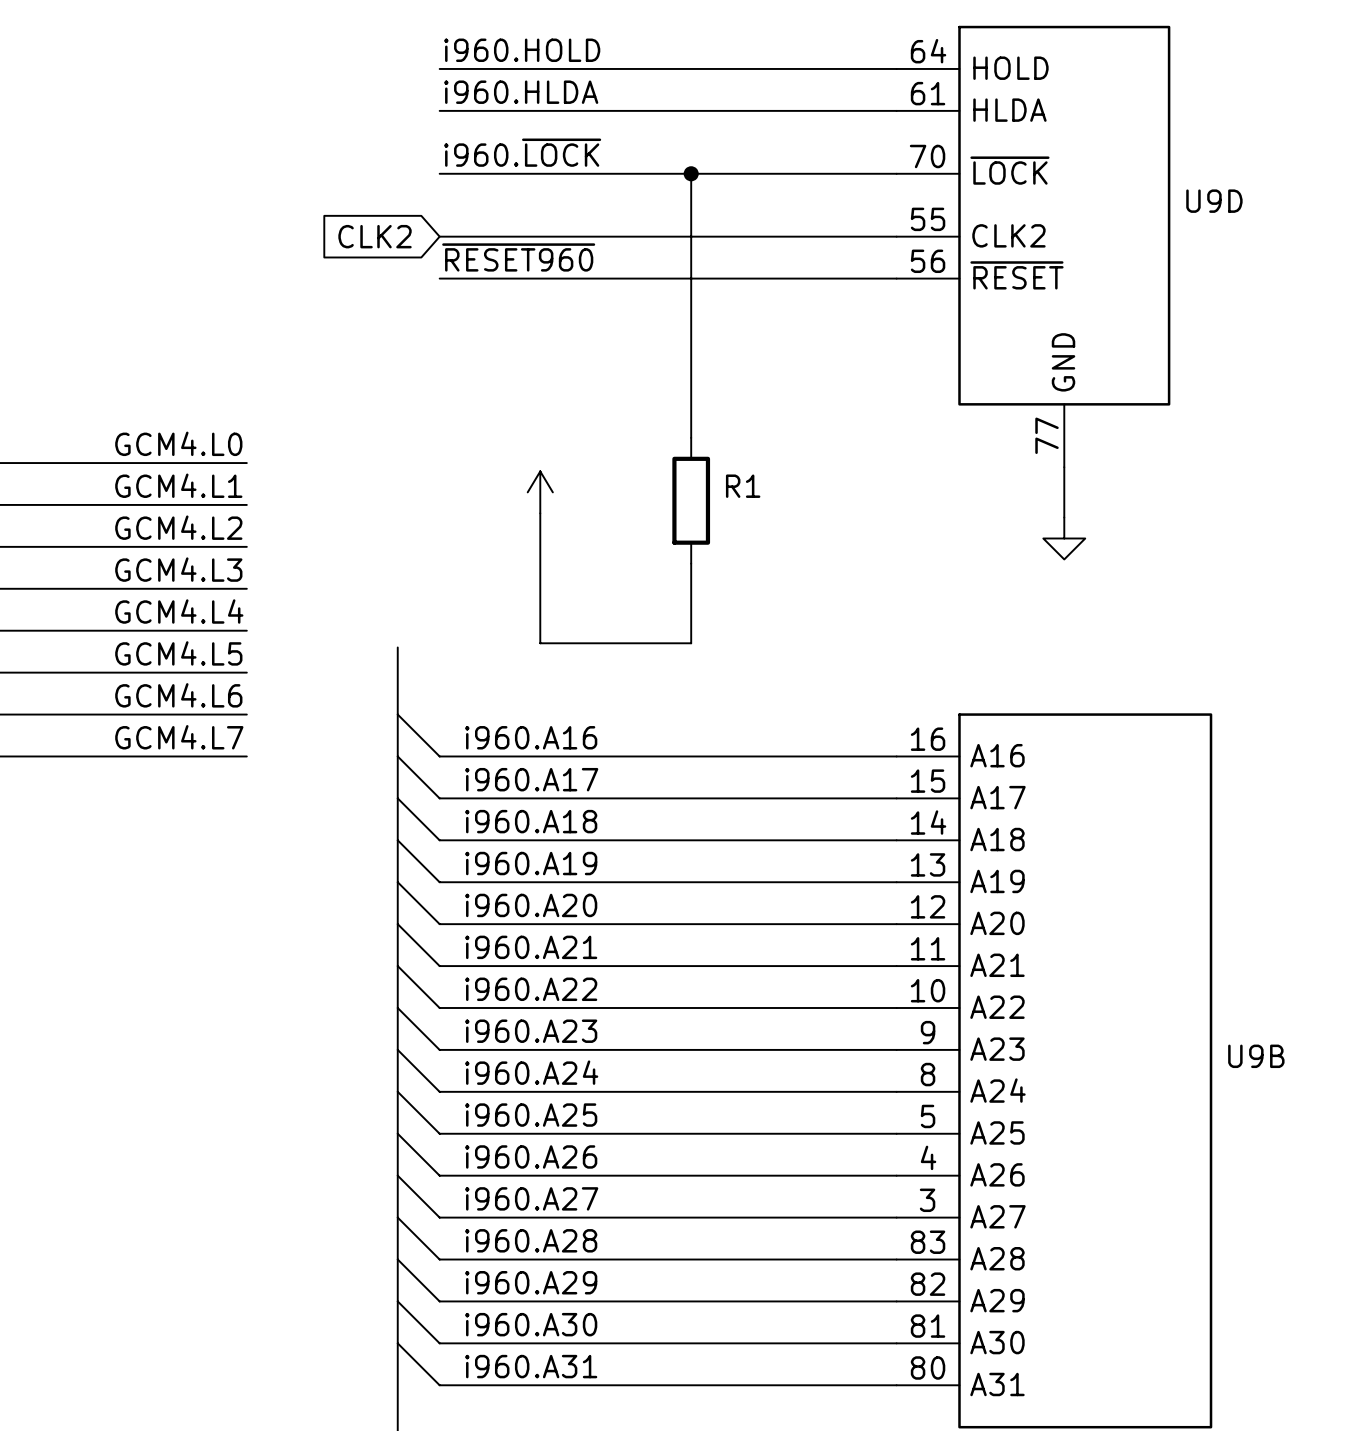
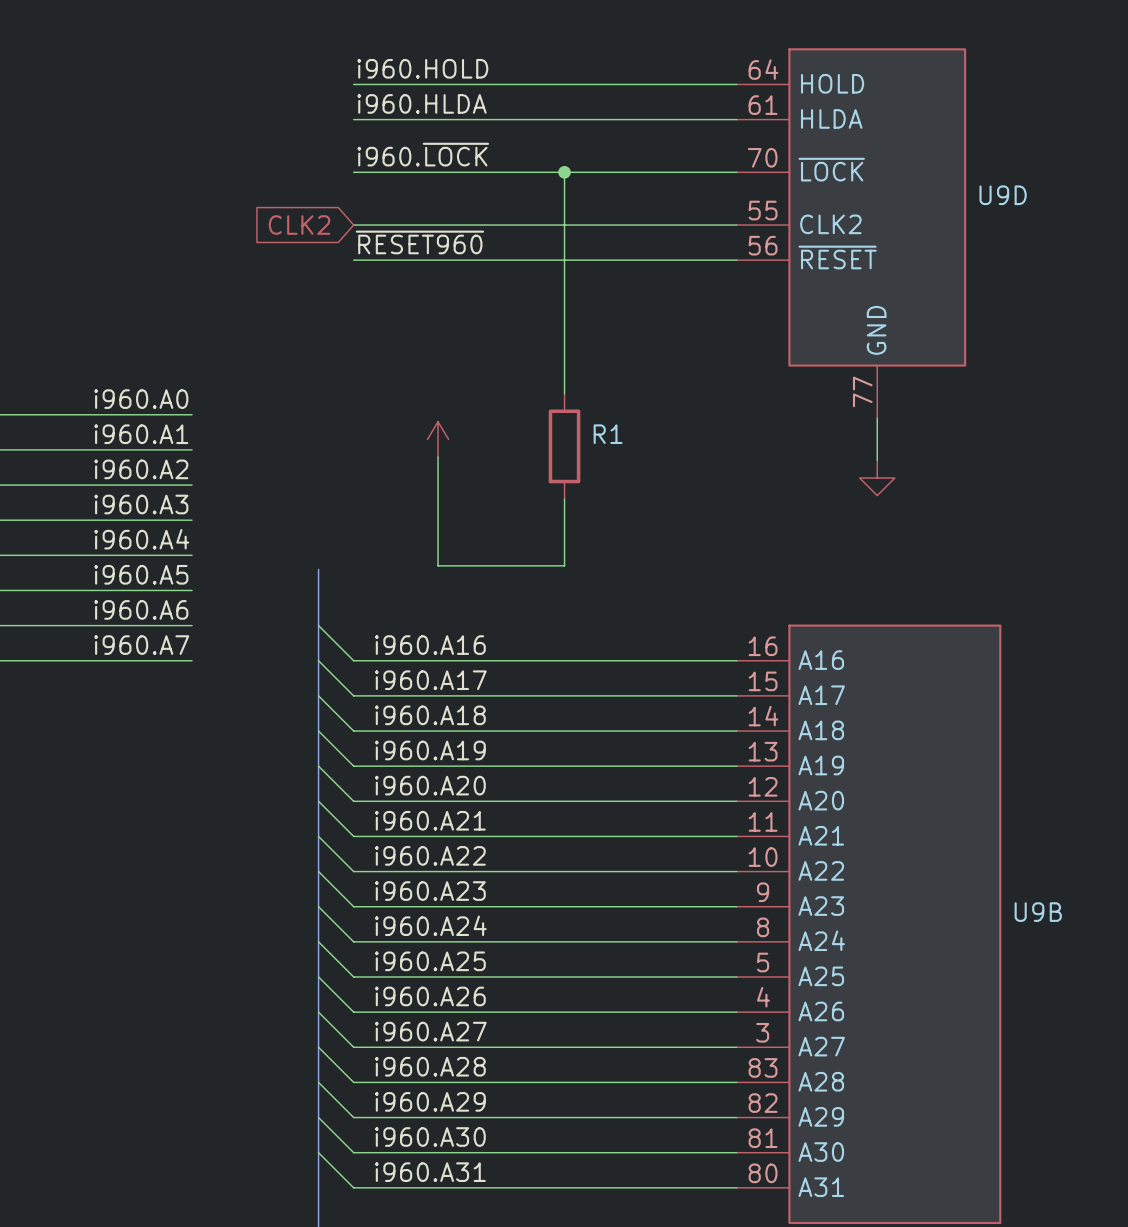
label: GCM4.L0 (178, 443) -> i960.A0 (141, 399)
label: GCM4.L1 (178, 485) -> i960.A1 (141, 434)
label: GCM4.L2 (178, 527) -> i960.A2 (141, 469)
label: GCM4.L3 (178, 569) -> i960.A3 (141, 504)
label: GCM4.L4 (179, 611) -> i960.A4 (141, 539)
label: GCM4.L5 (178, 653) -> i960.A5 (141, 574)
label: GCM4.L6 (178, 695) -> i960.A6 (141, 609)
label: GCM4.L7 (179, 737) -> i960.A7 (141, 645)

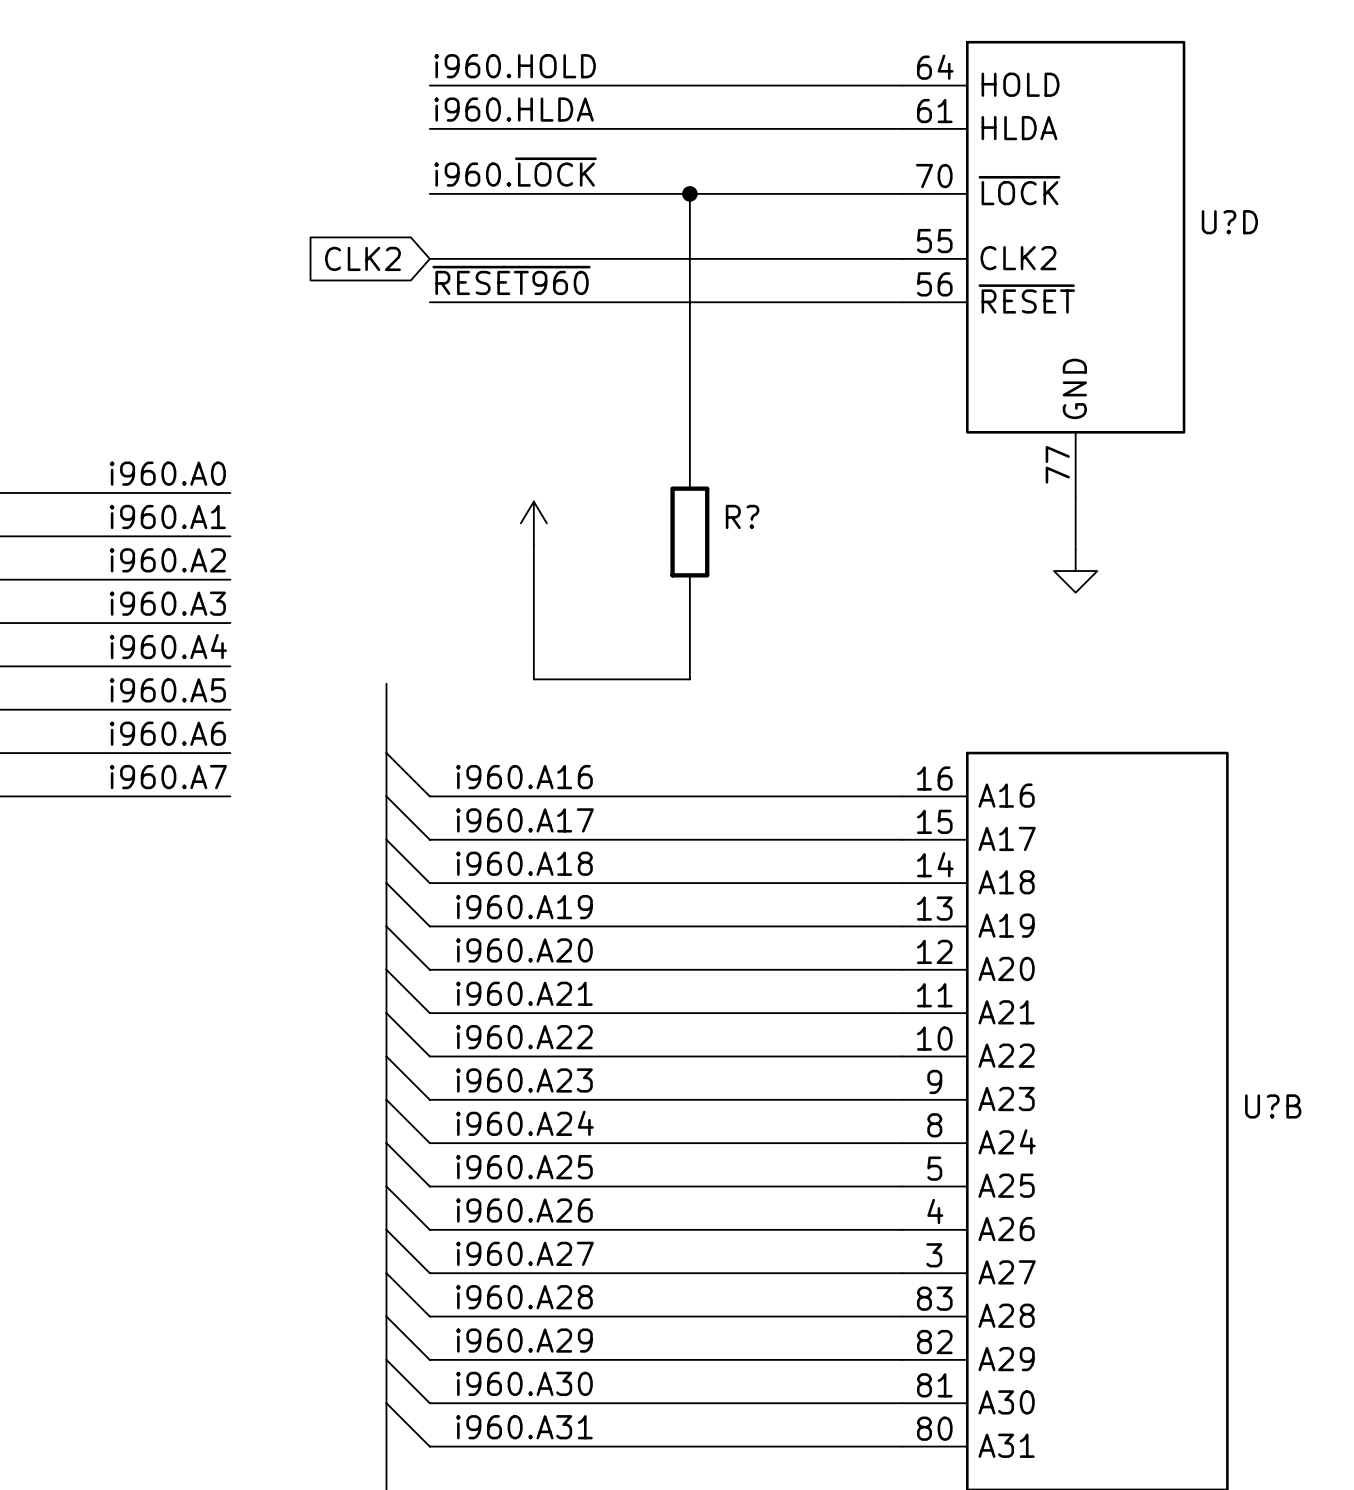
U9D name: U9D (1003, 195) -> U?D (1229, 222)
R1 name: R1 (608, 434) -> R? (742, 516)
U9B name: U9B (1038, 912) -> U?B (1273, 1106)

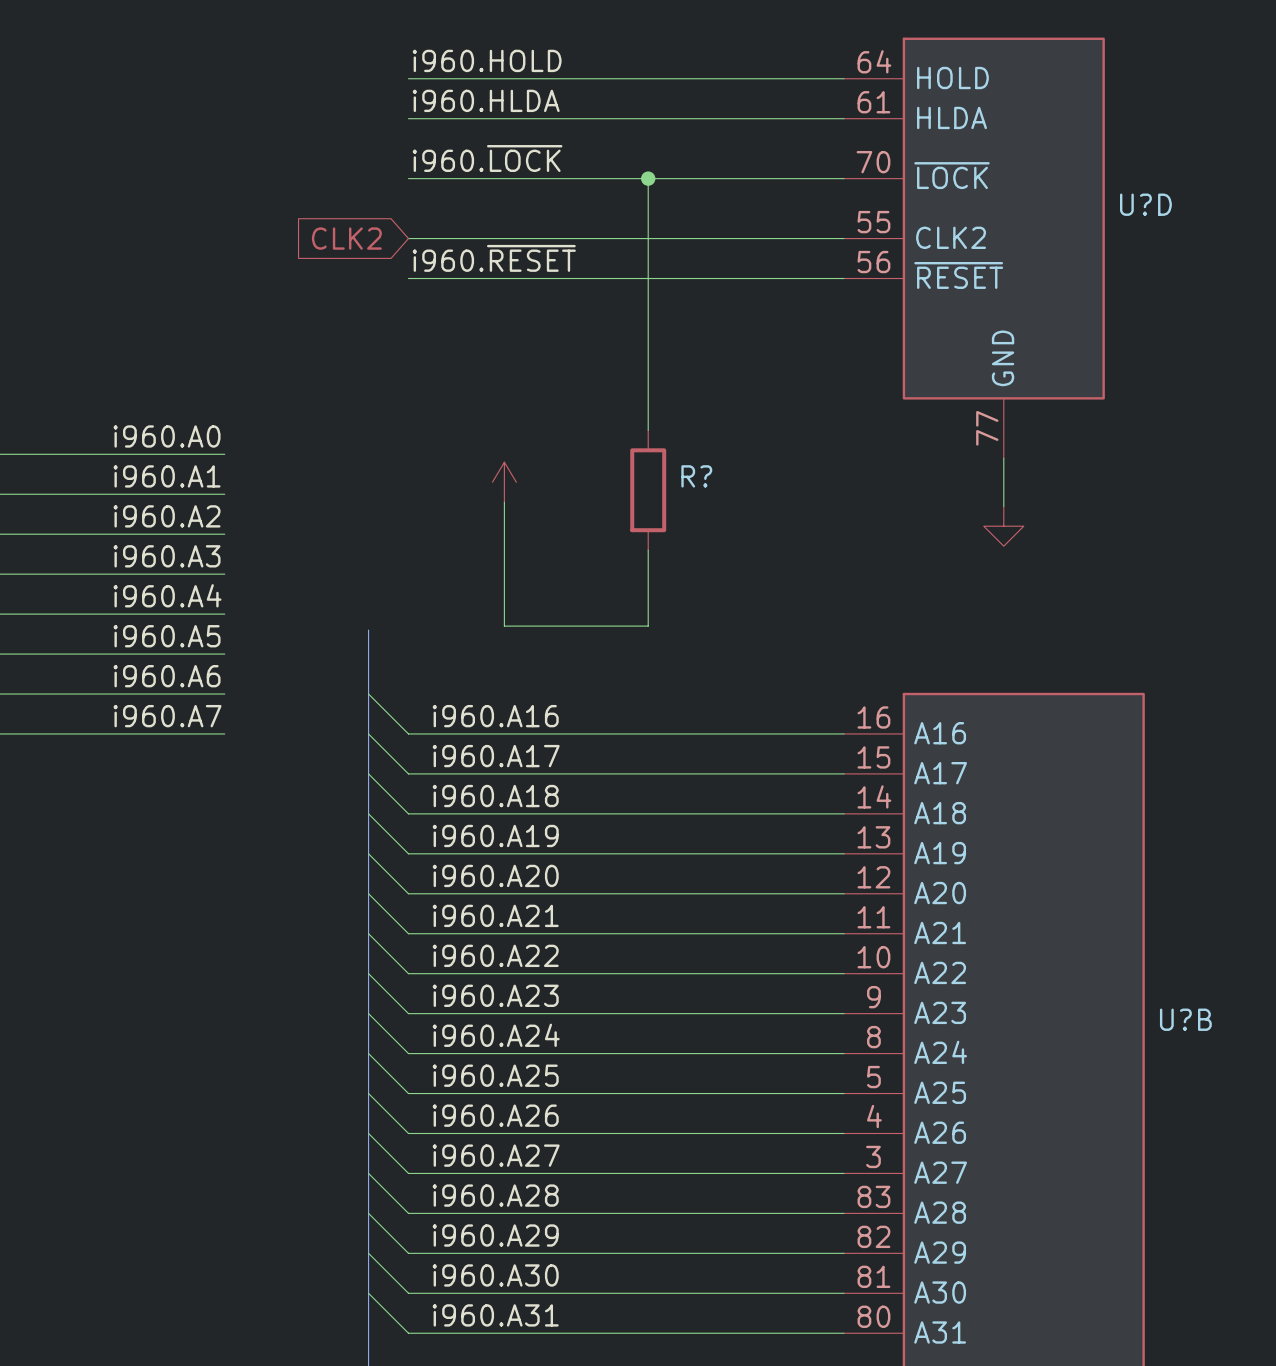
label: ~{RESET960} (511, 280) -> i960.~{RESET} (494, 258)

